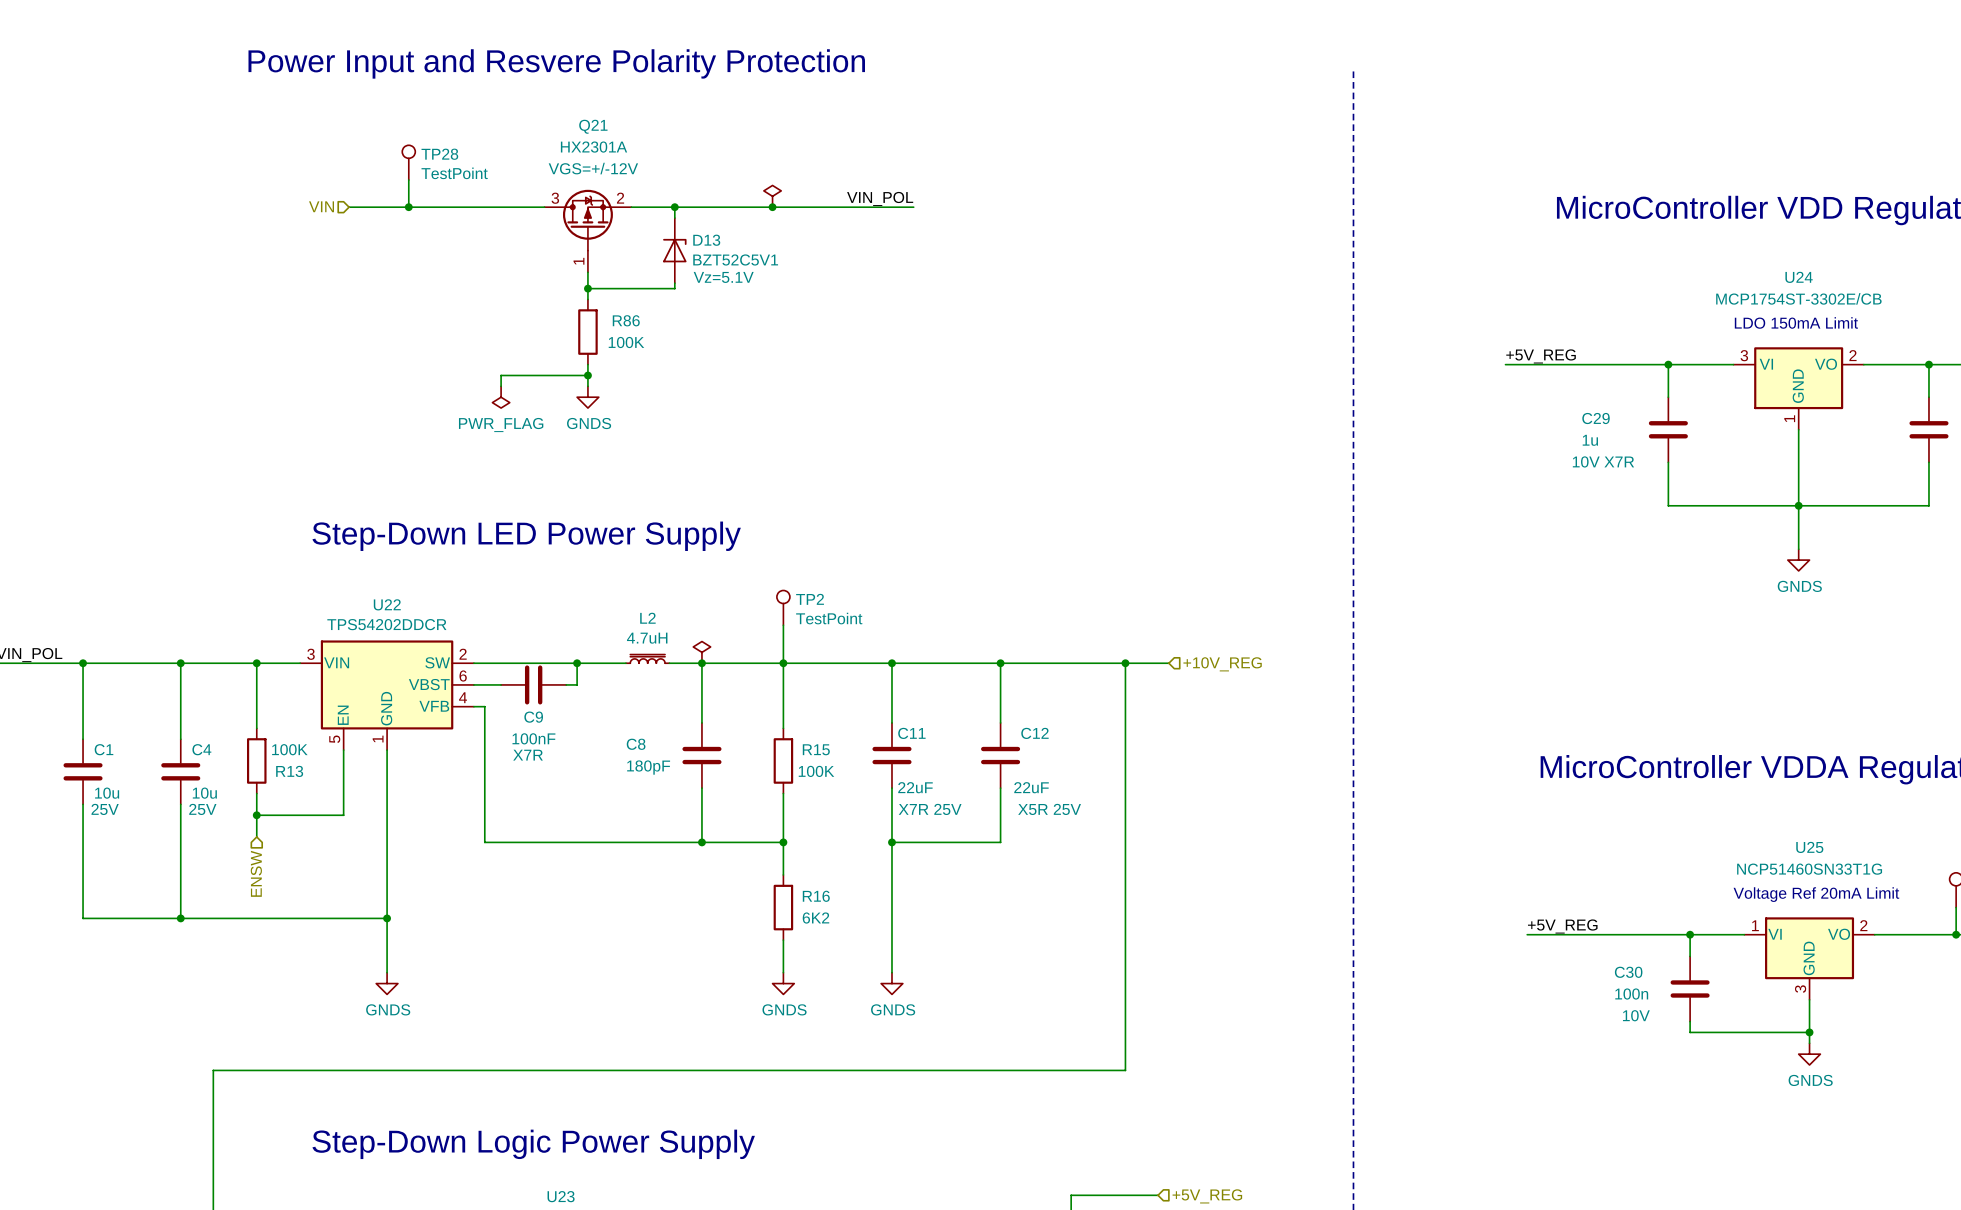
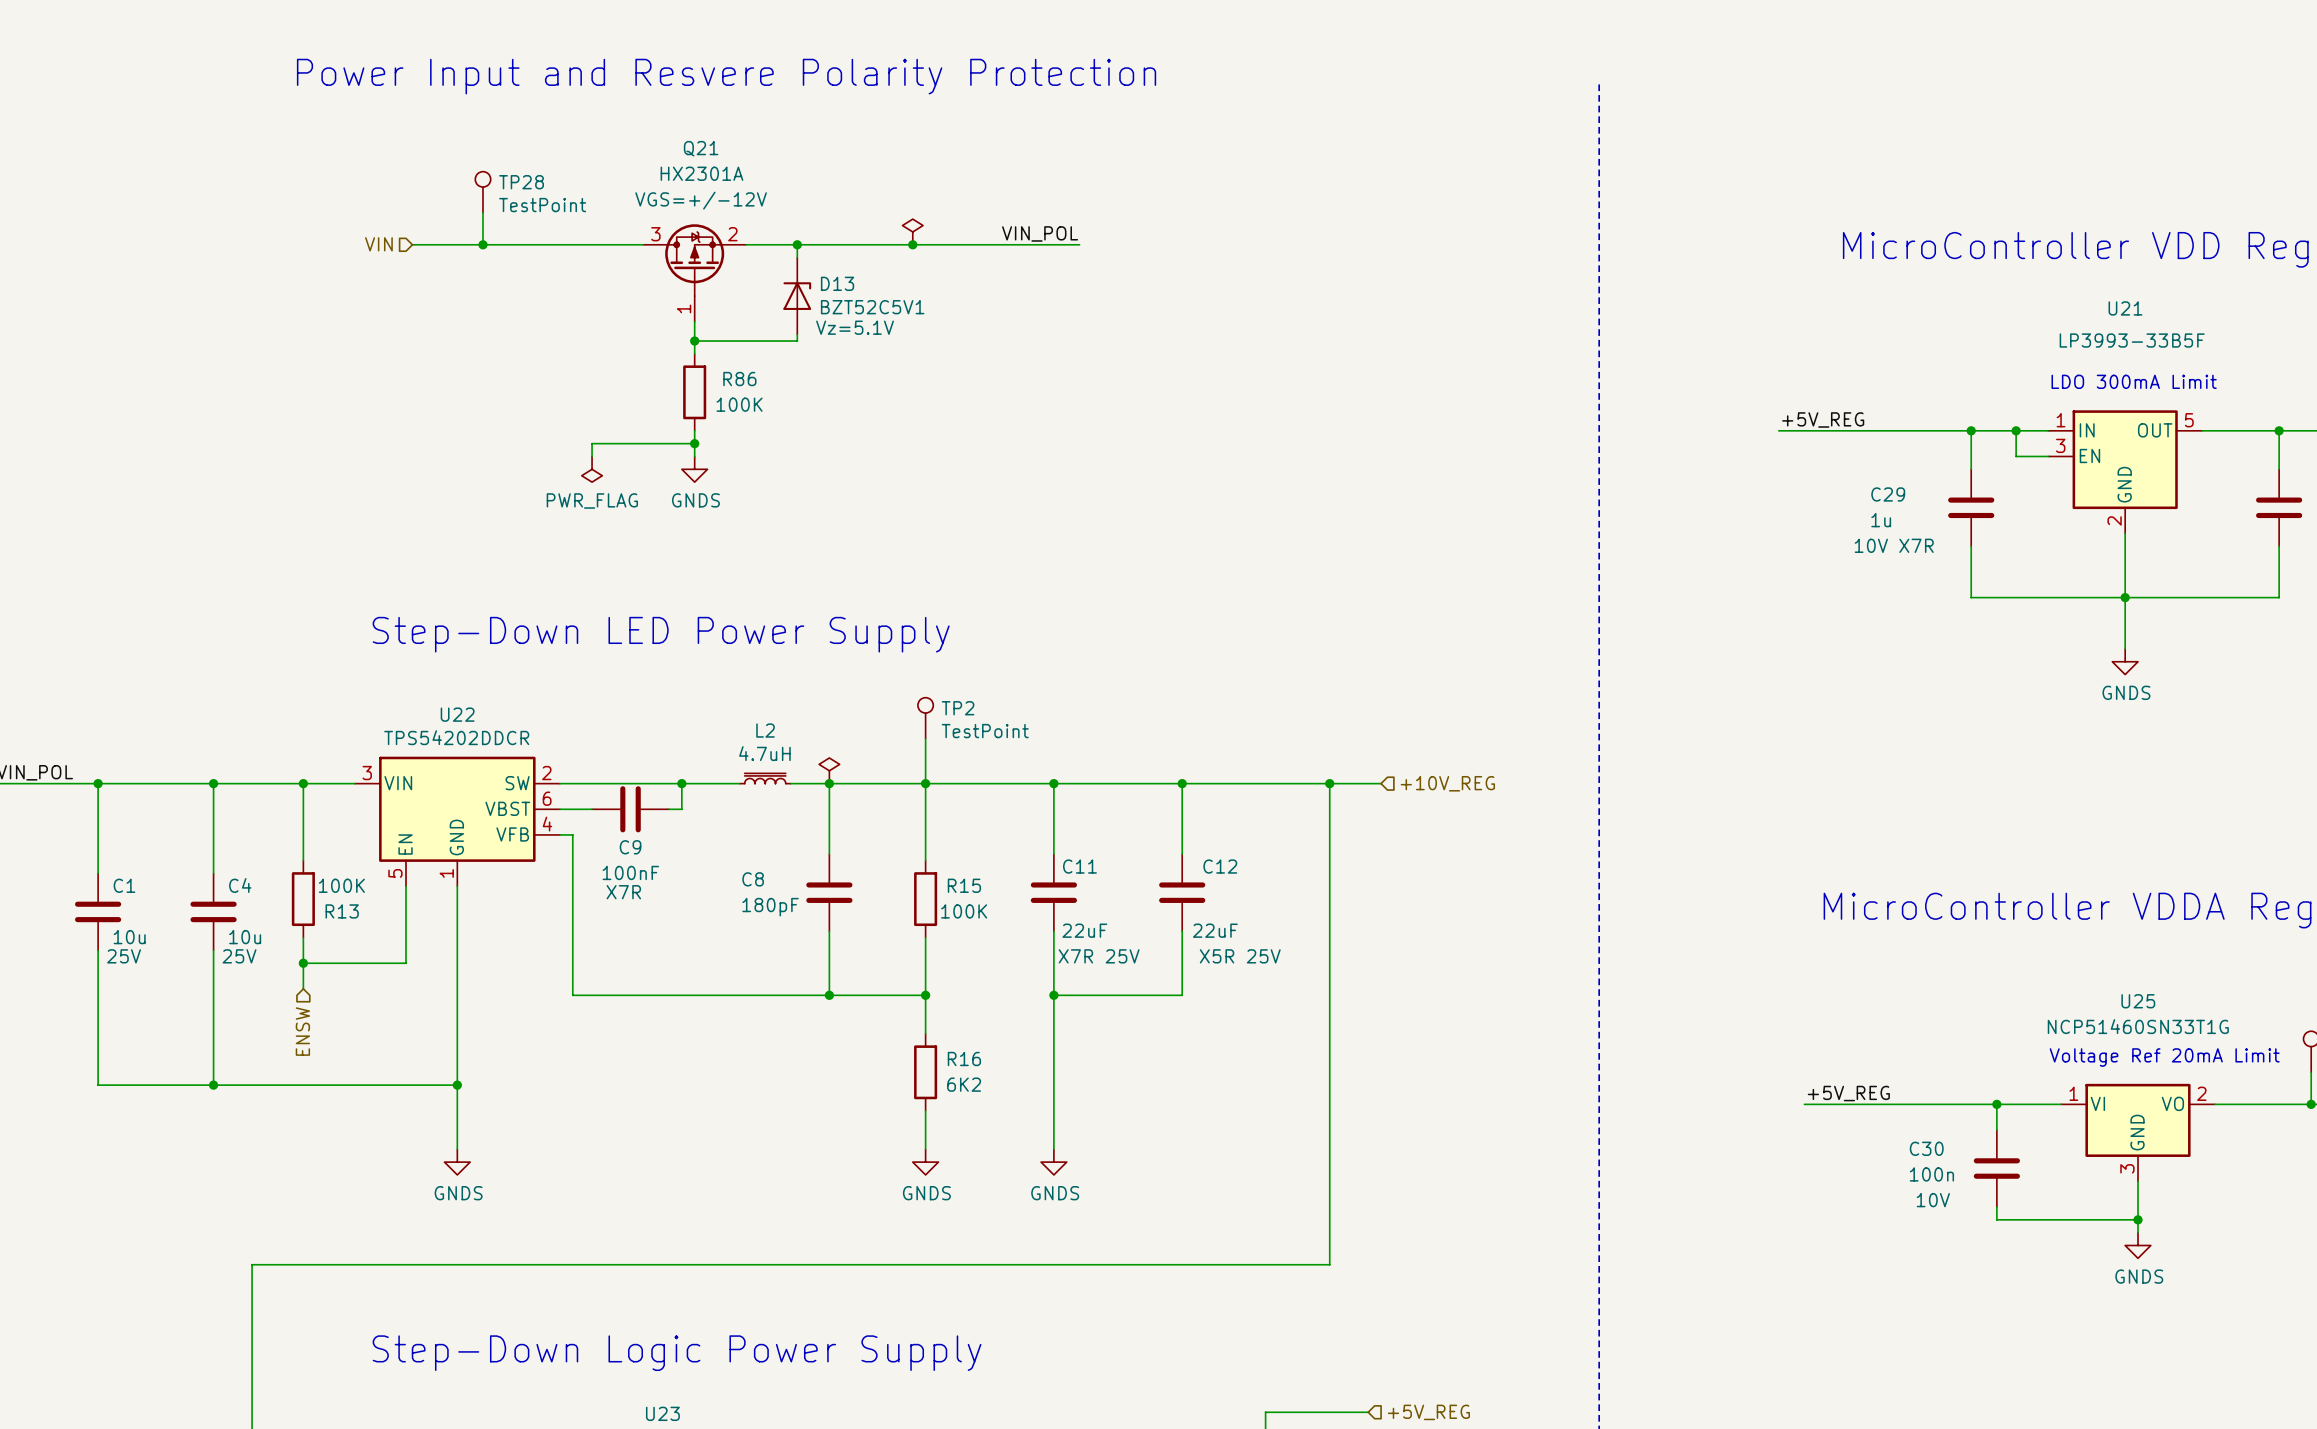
text: LDO 150mA Limit (1796, 322) -> LDO 300mA Limit (2134, 381)
wire: none -> (2016, 430) (2016, 456) (2048, 456)
junction: none -> (2016, 430)
U24: MCP1754ST-3302E/CB (1798, 388) -> none
U21: none -> LP3993-33B5F (2125, 471)

